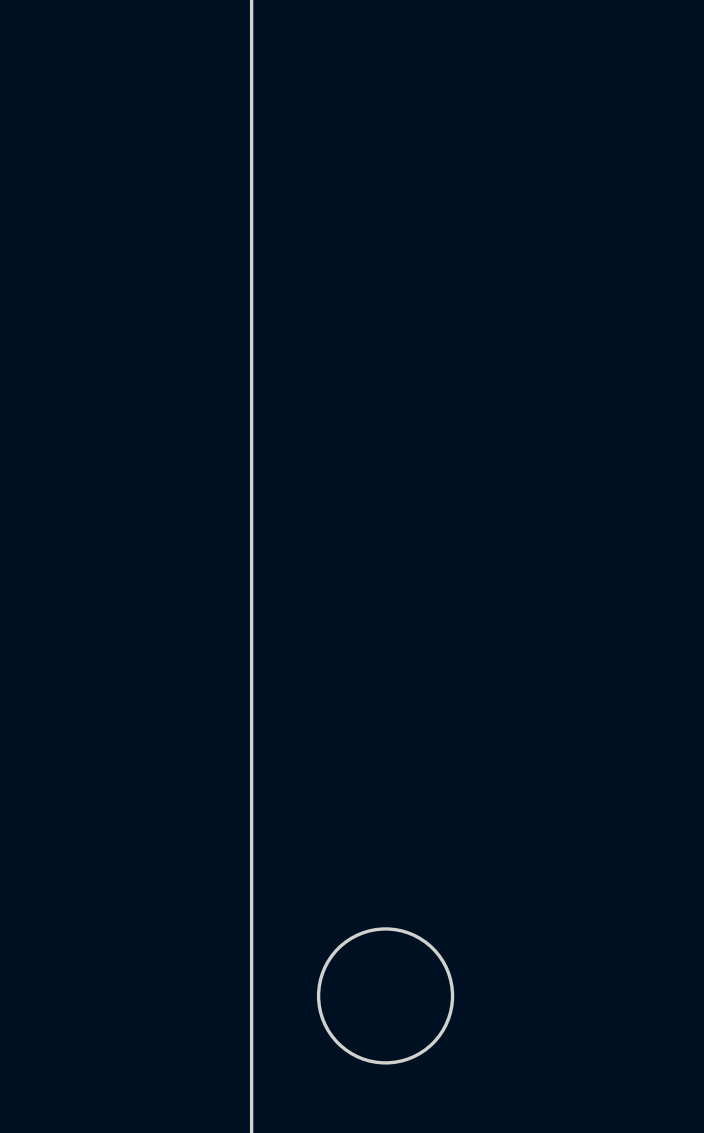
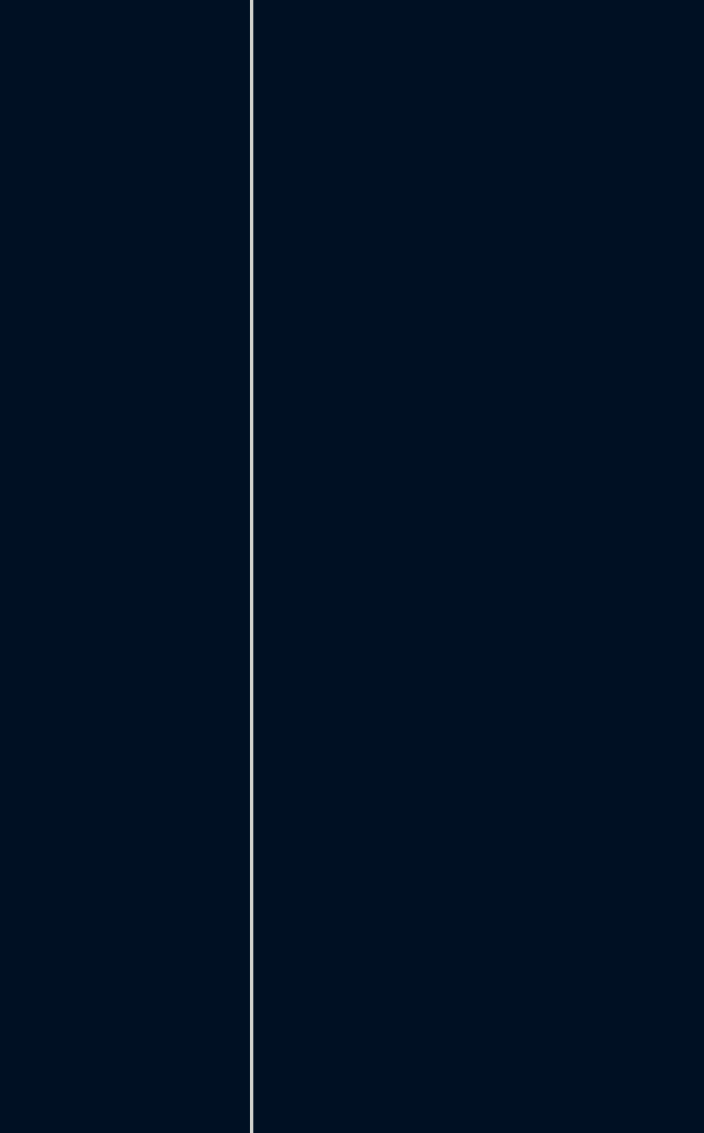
round board edge: [316, 927, 455, 1065] -> none

